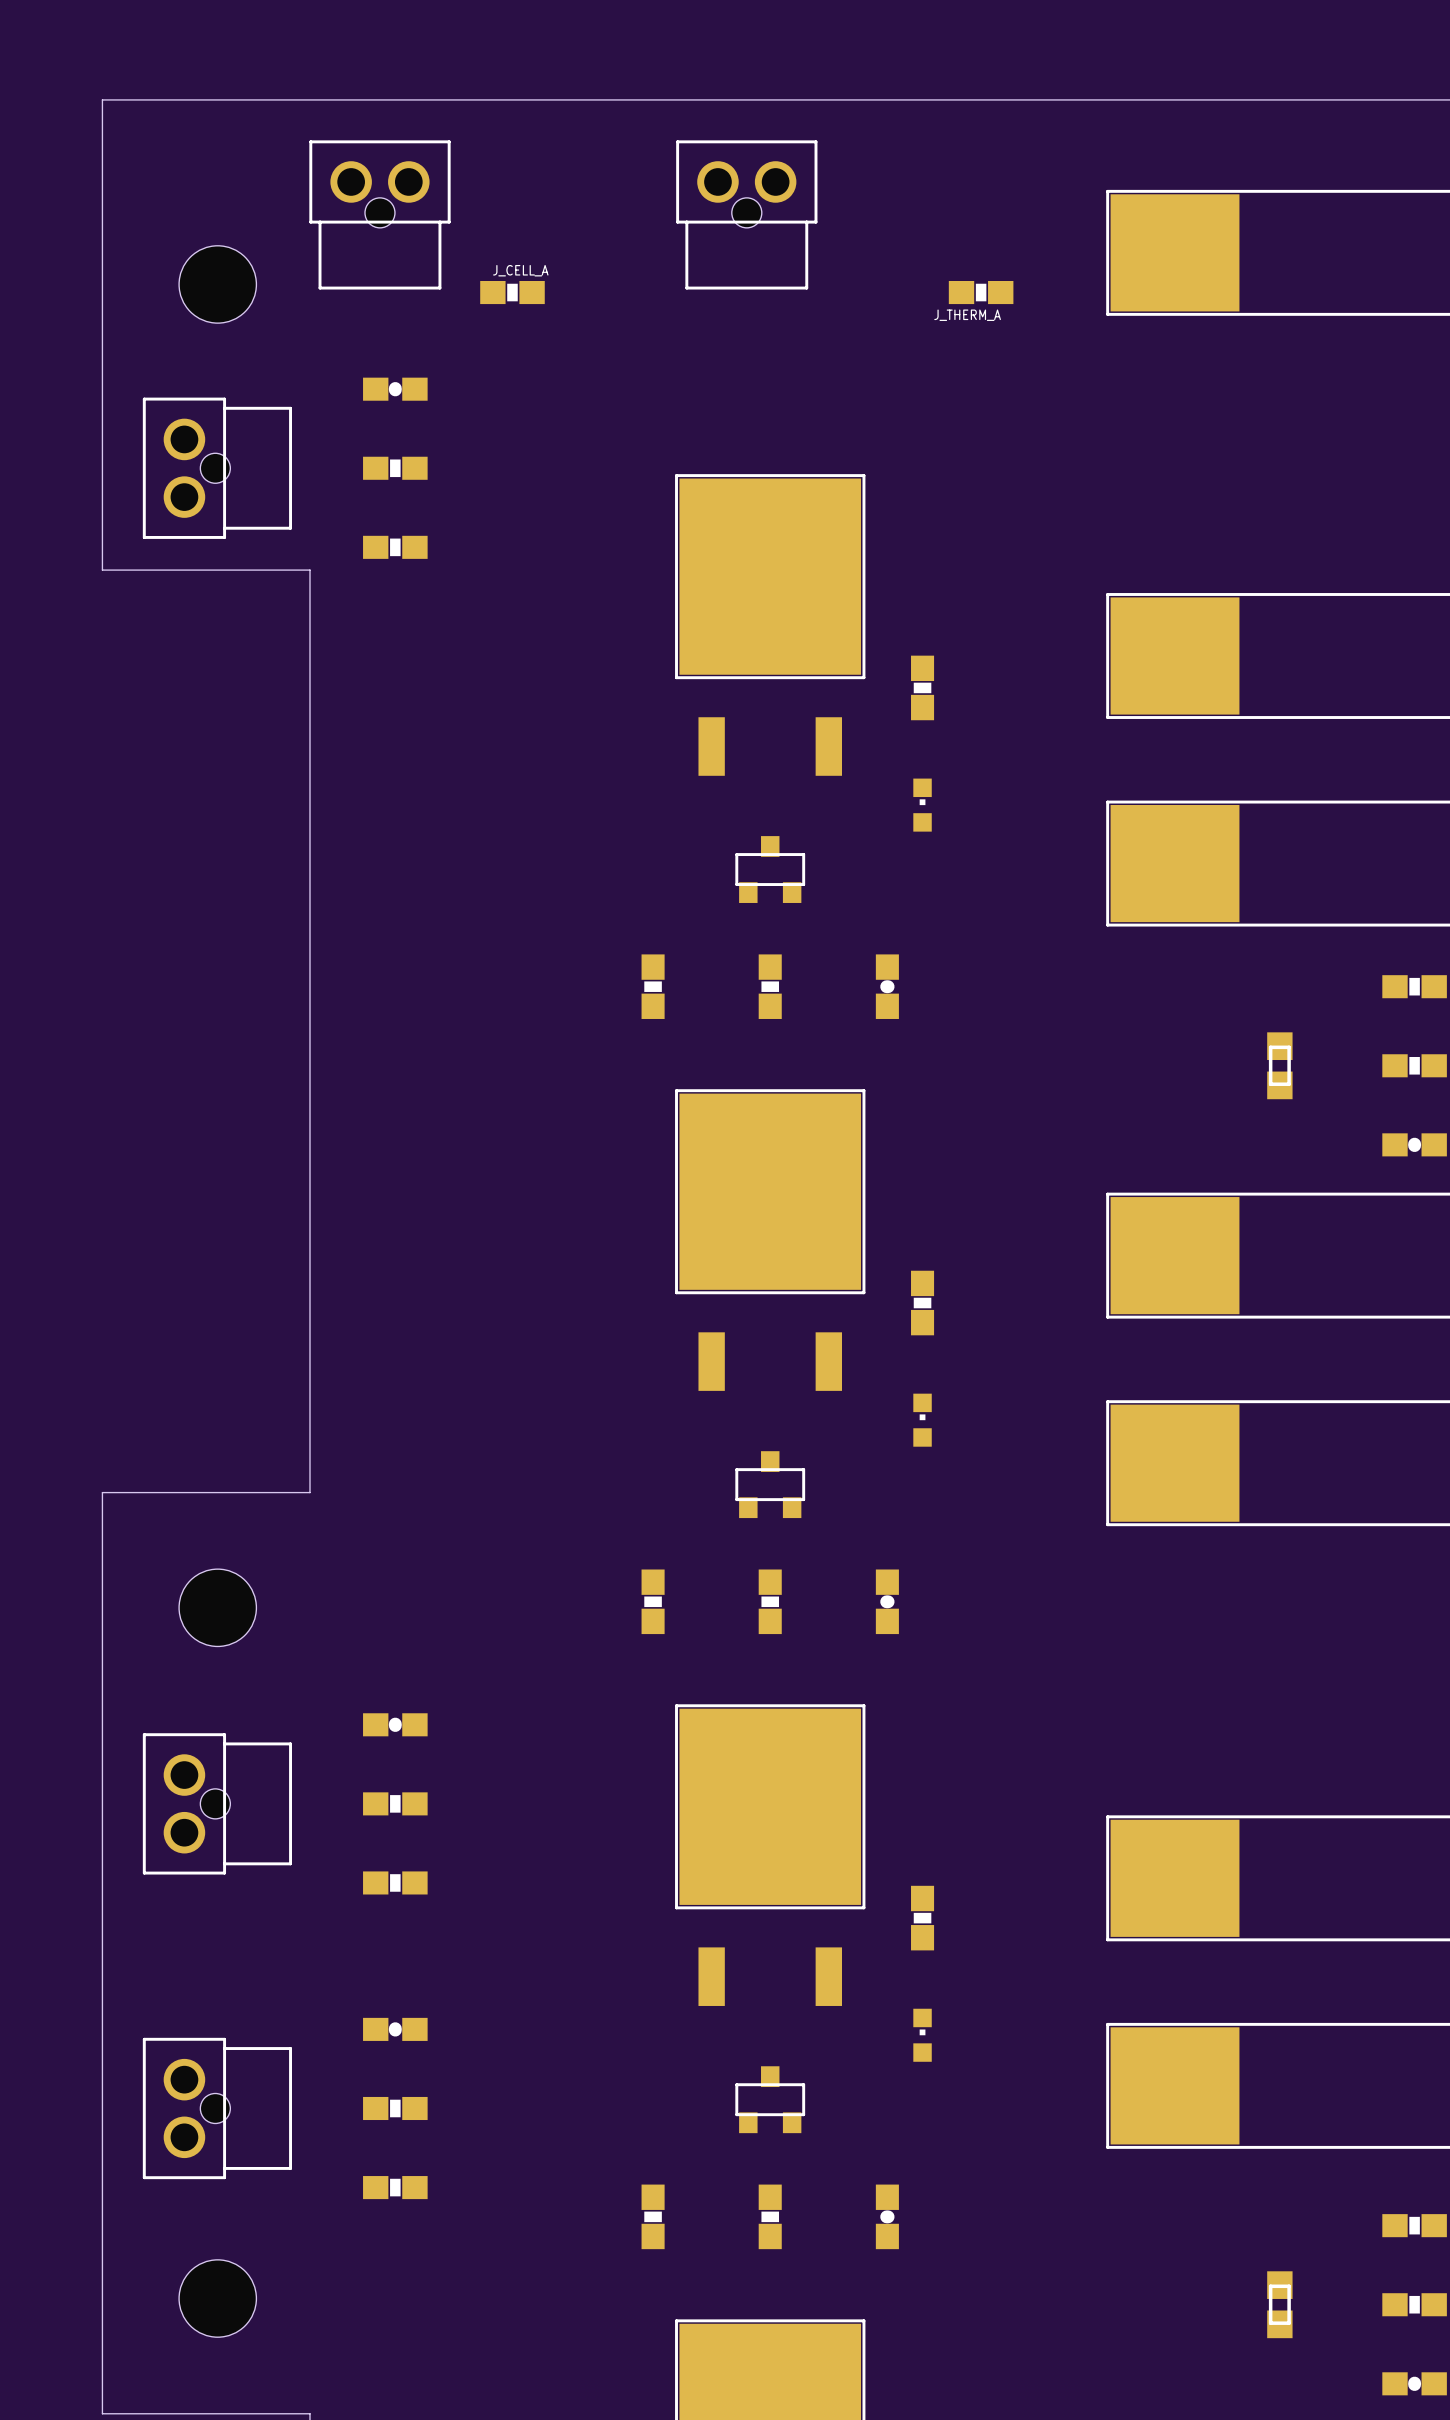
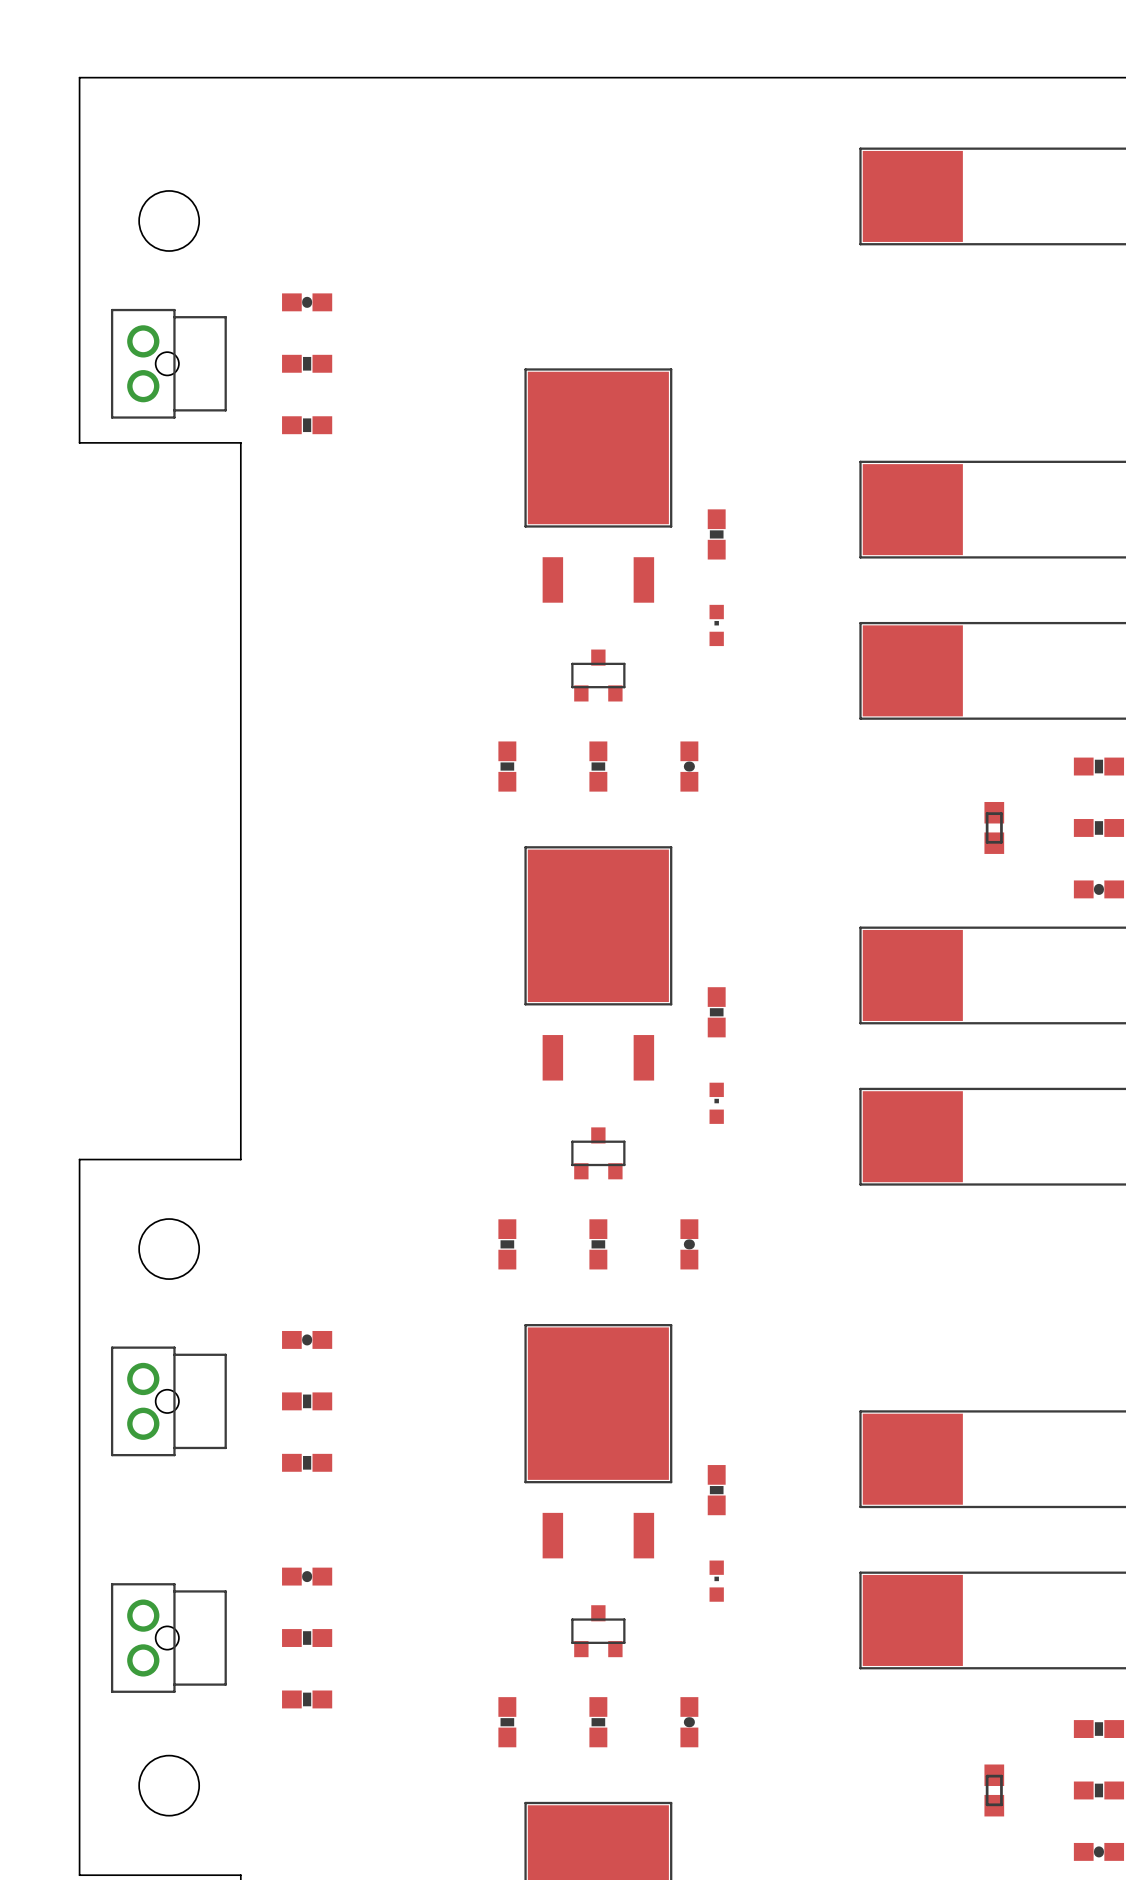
part: (379, 214) -> none
part: (746, 214) -> none
J_CELL_A: (512, 292) -> none
J_THERM_A: (981, 292) -> none

